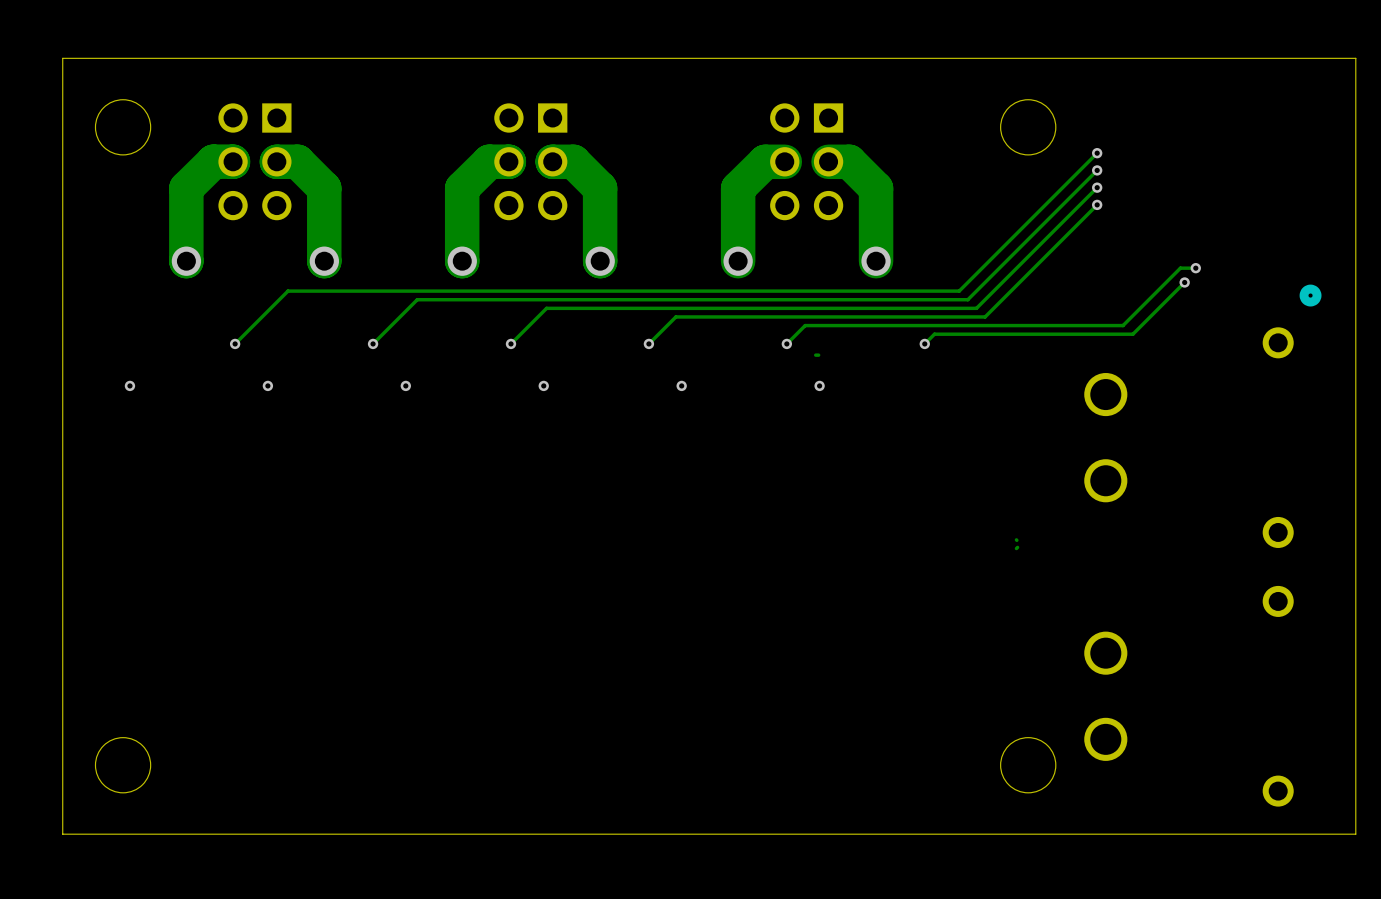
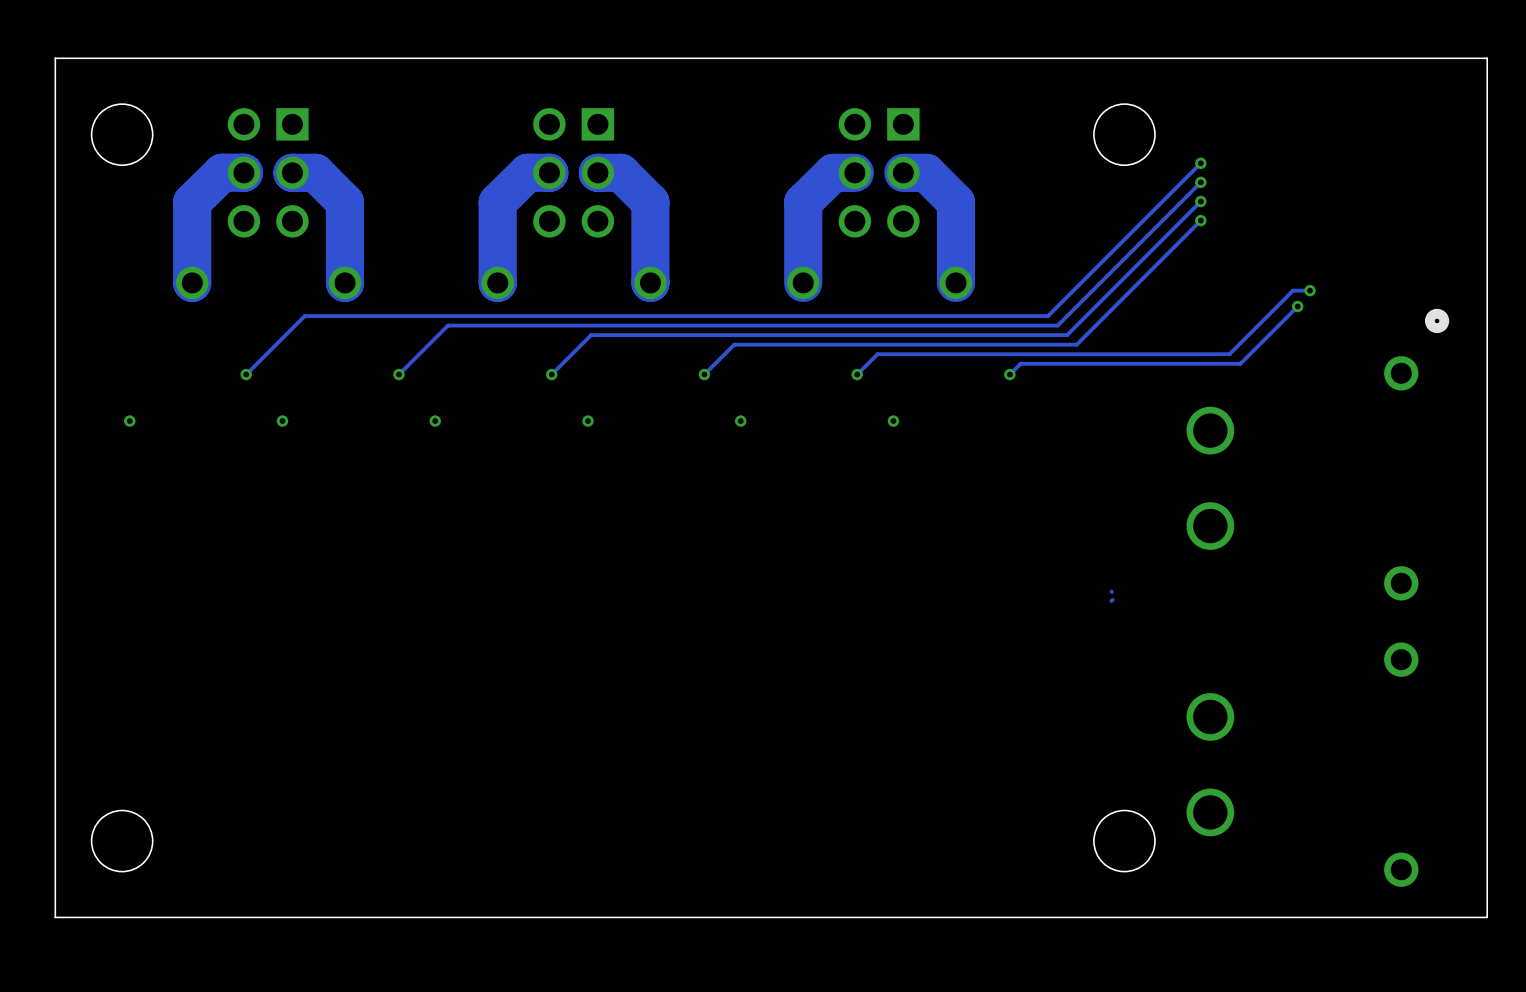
track: (818, 355) (815, 355) -> none

